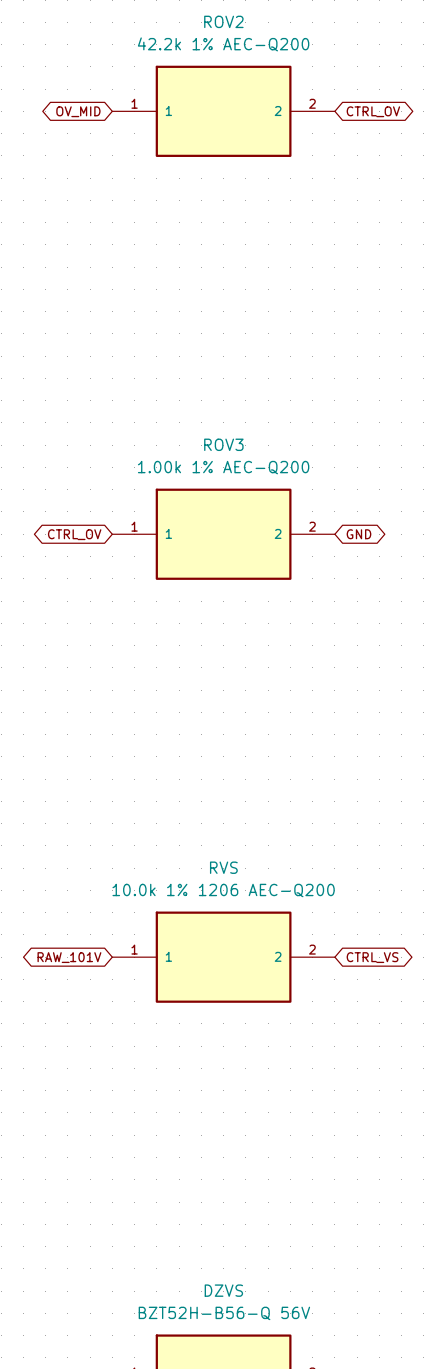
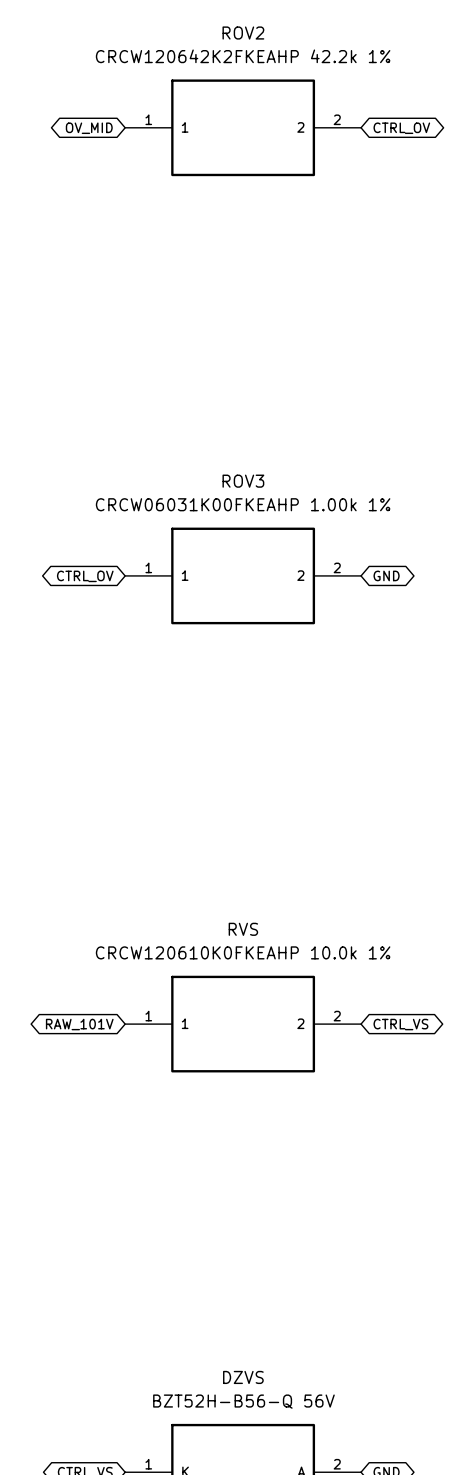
ROV2 value: 42.2k 1% AEC-Q200 (223, 44) -> CRCW120642K2FKEAHP 42.2k 1% (243, 56)
ROV3 value: 1.00k 1% AEC-Q200 (223, 467) -> CRCW06031K00FKEAHP 1.00k 1% (243, 504)
RVS value: 10.0k 1% 1206 AEC-Q200 (223, 890) -> CRCW120610K0FKEAHP 10.0k 1% (243, 952)

